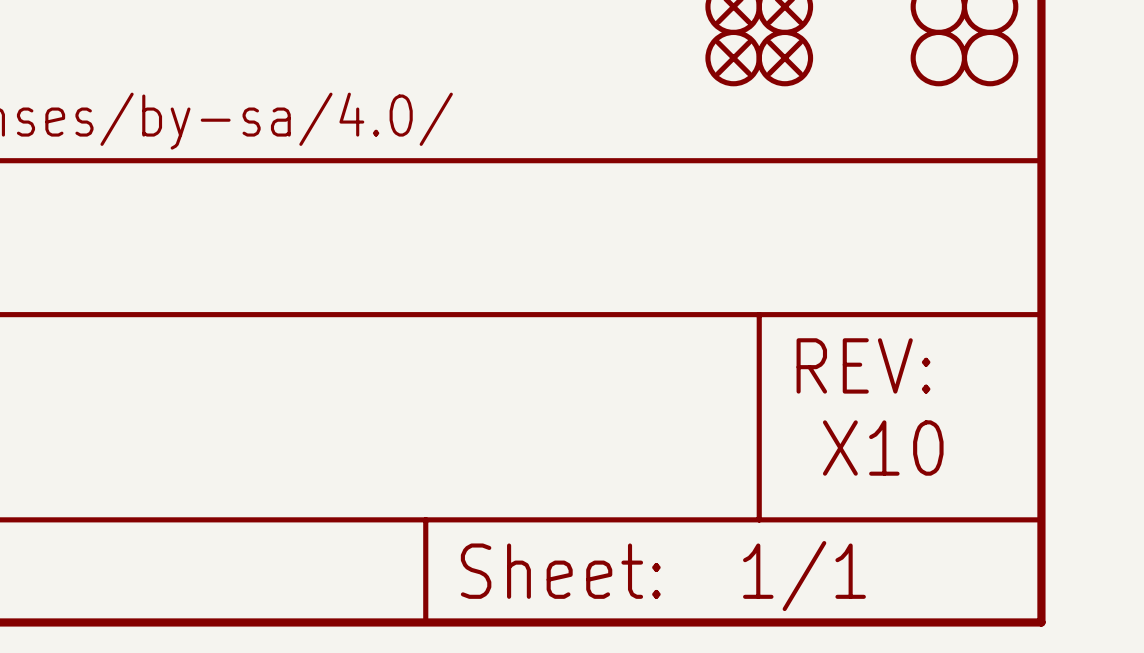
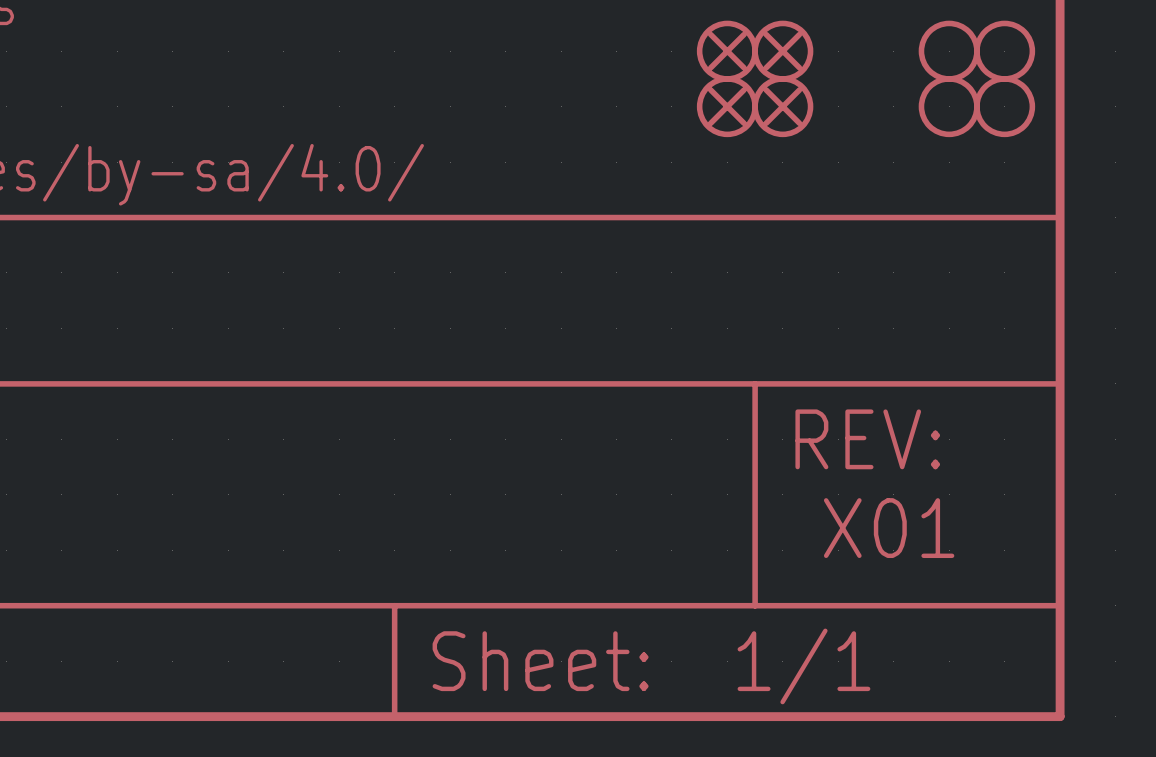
text: X10 (883, 448) -> X01 (889, 528)

